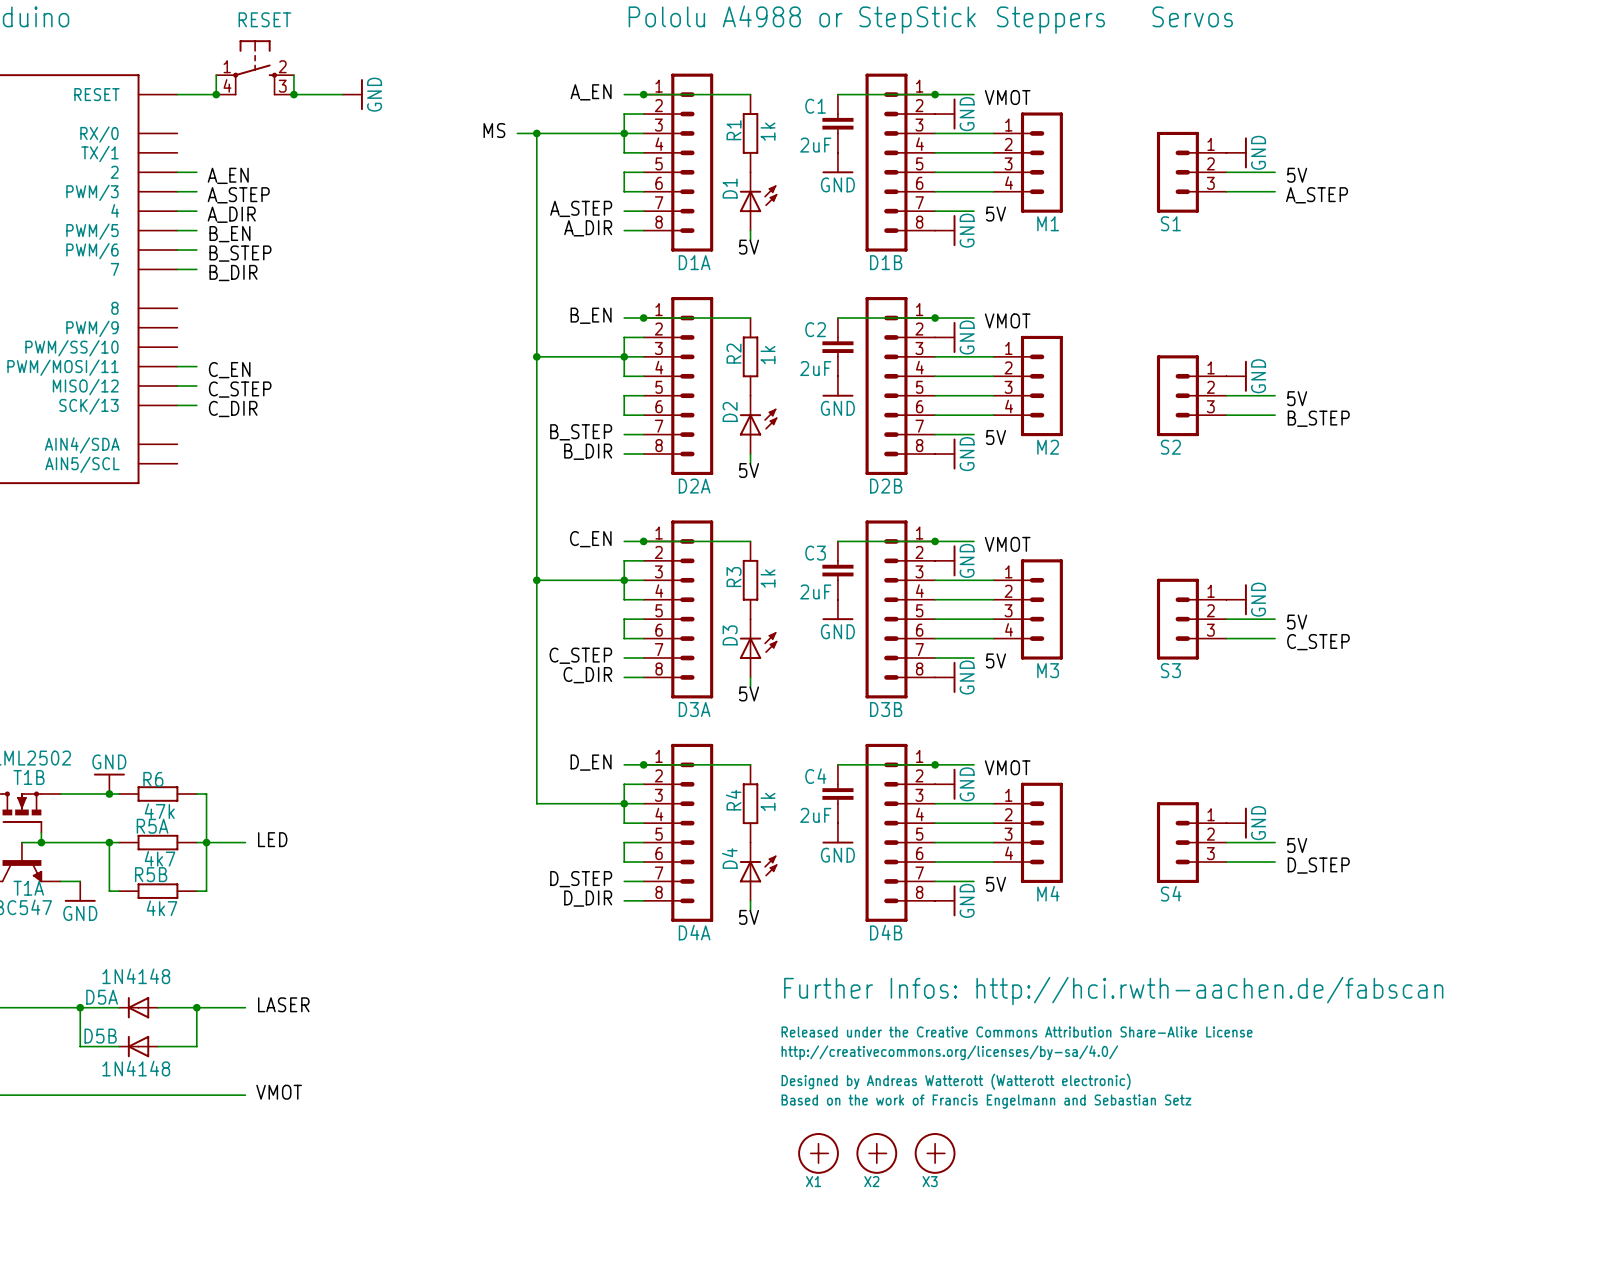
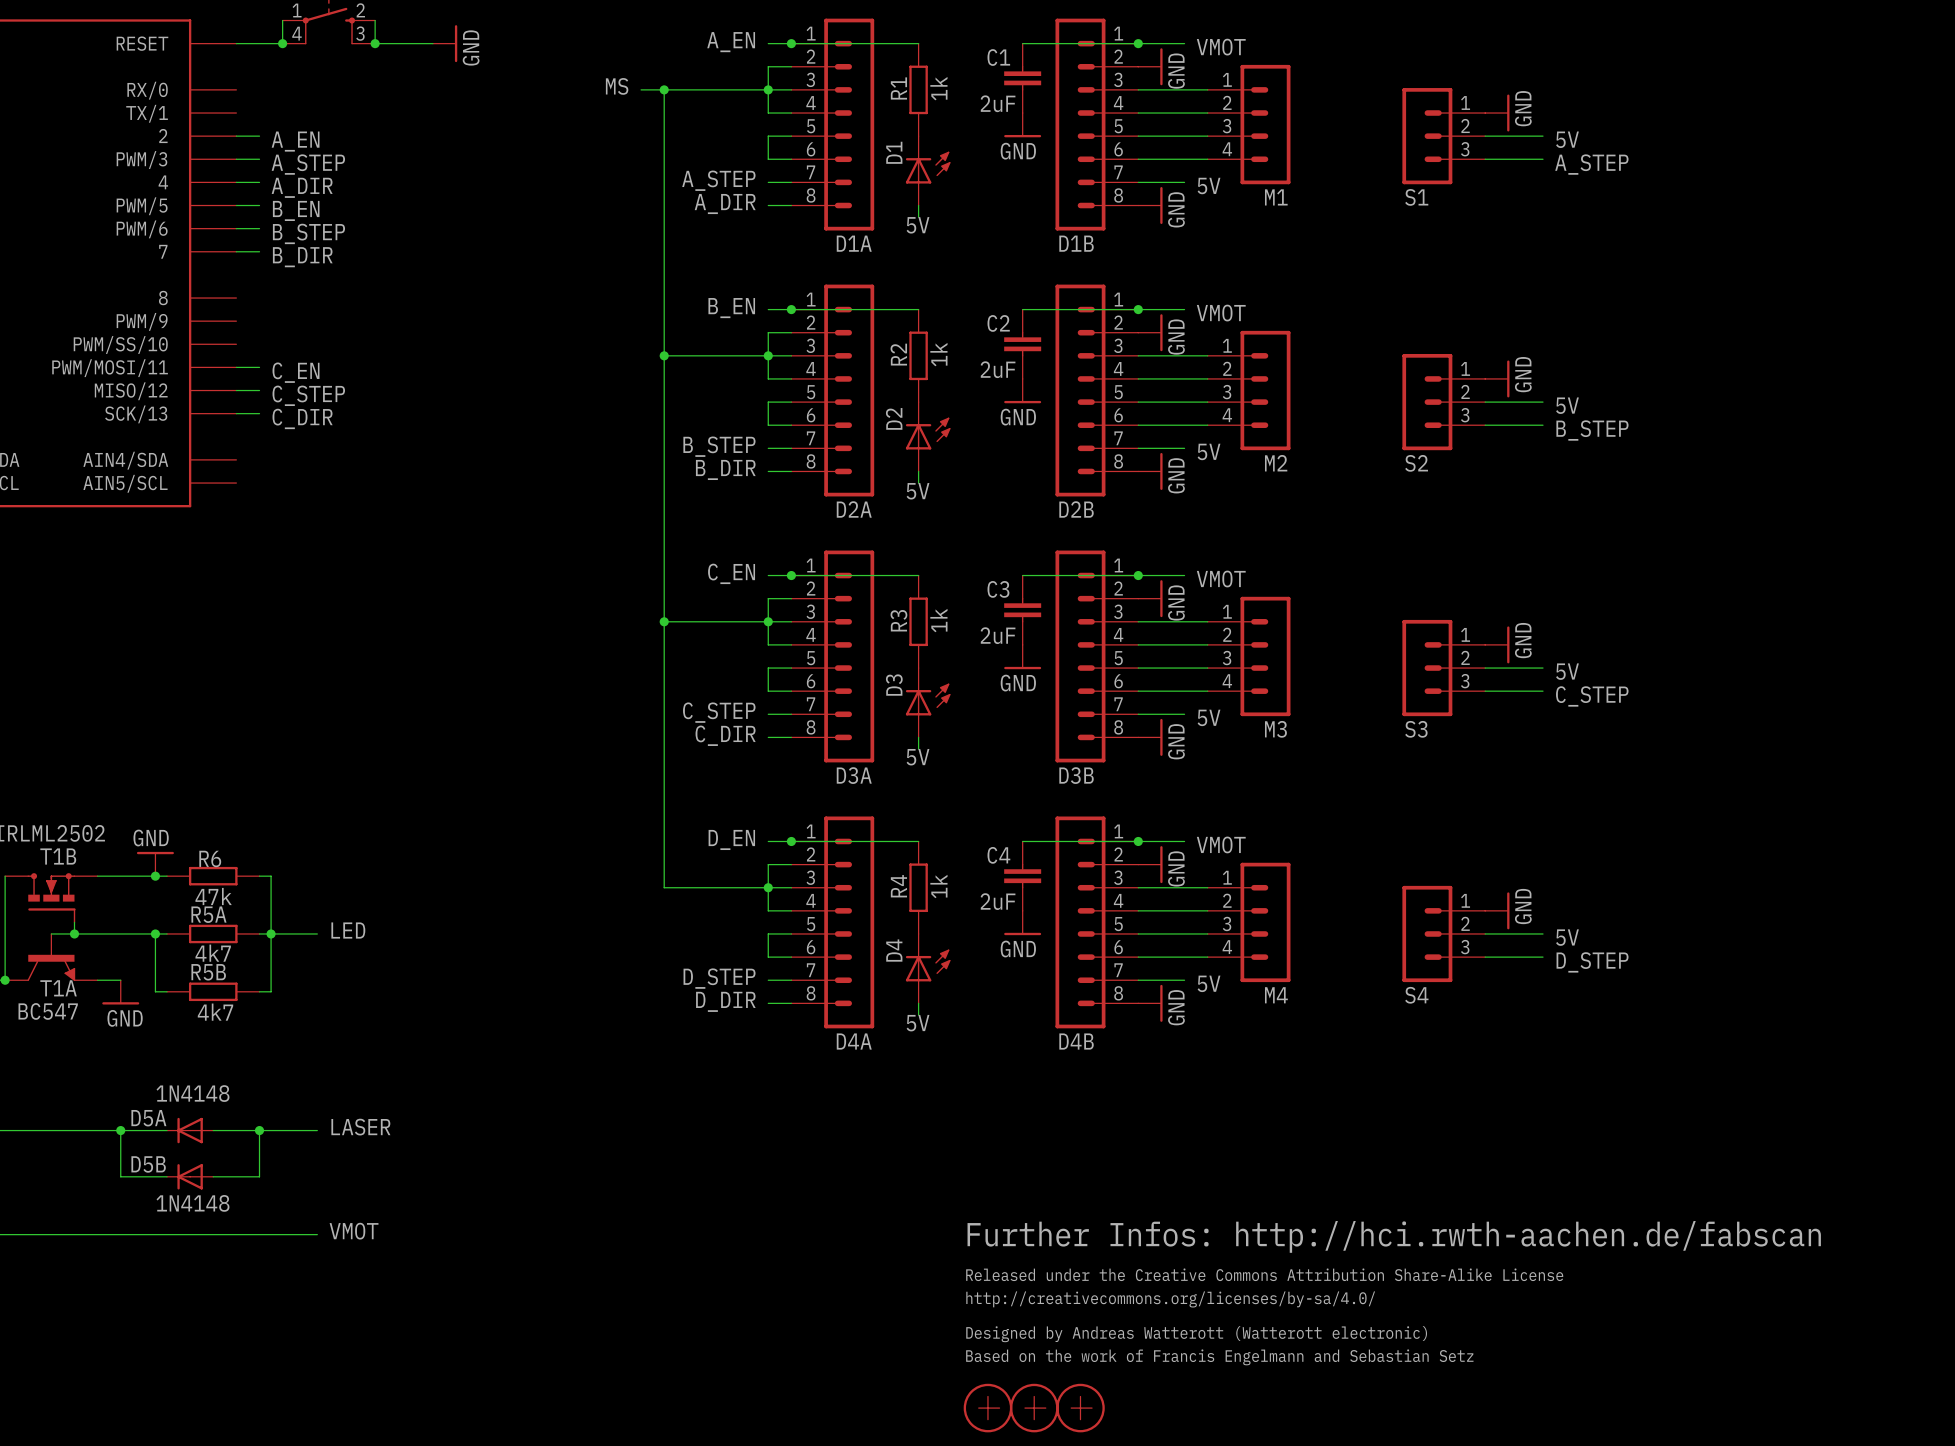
text position: Further Infos: http://hci.rwth-aachen.de/fabscan (1113, 991) -> Further Infos: http://hci.rwth-aachen.de/fabscan (1394, 1236)
text position: Released under the Creative Commons Attribution Share-Alike License (1017, 1031) -> Released under the Creative Commons Attribution Share-Alike License (1264, 1274)
text position: http://creativecommons.org/licenses/by-sa/4.0/ (949, 1052) -> http://creativecommons.org/licenses/by-sa/4.0/ (1170, 1299)
text position: Designed by Andreas Watterott (Watterott electronic) (956, 1081) -> Designed by Andreas Watterott (Watterott electronic) (1196, 1334)
text position: Based on the work of Francis Engelmann and Sebastian Setz (986, 1101) -> Based on the work of Francis Engelmann and Sebastian Setz (1219, 1357)
X1: (818, 1153) -> none
X2: (876, 1153) -> none
X3: (935, 1153) -> none
part: none -> (987, 1408)
part: none -> (1034, 1408)
part: none -> (1080, 1408)

